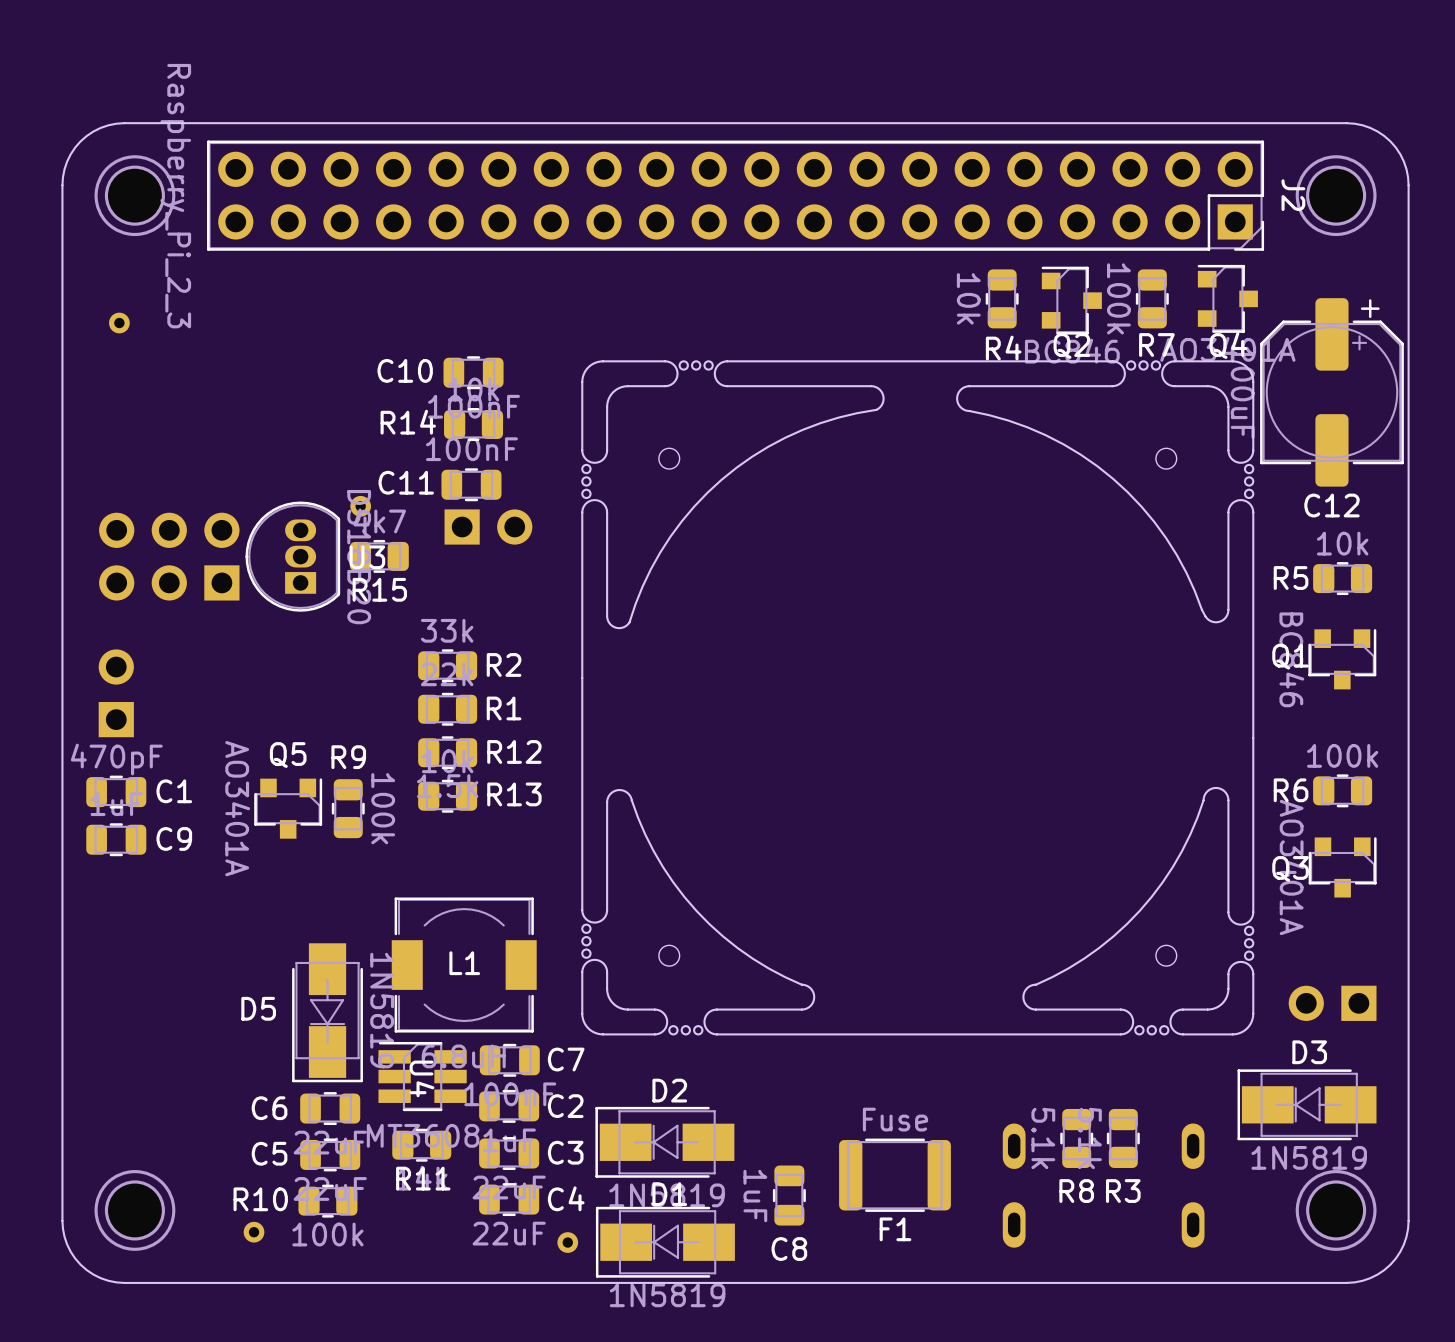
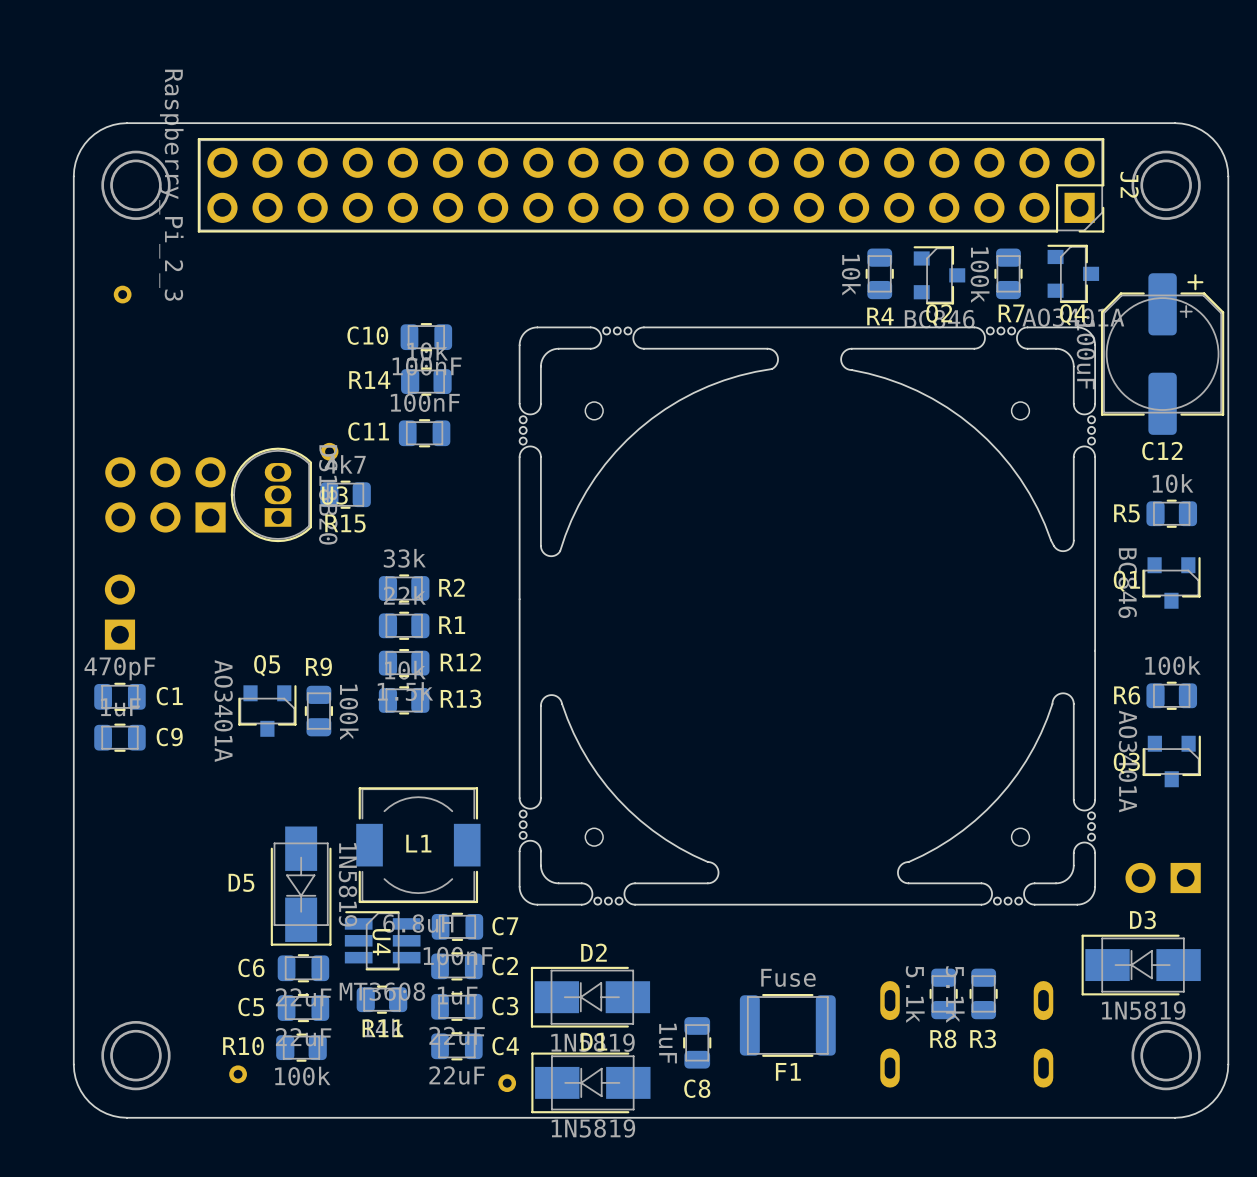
part: (488, 527) -> none

